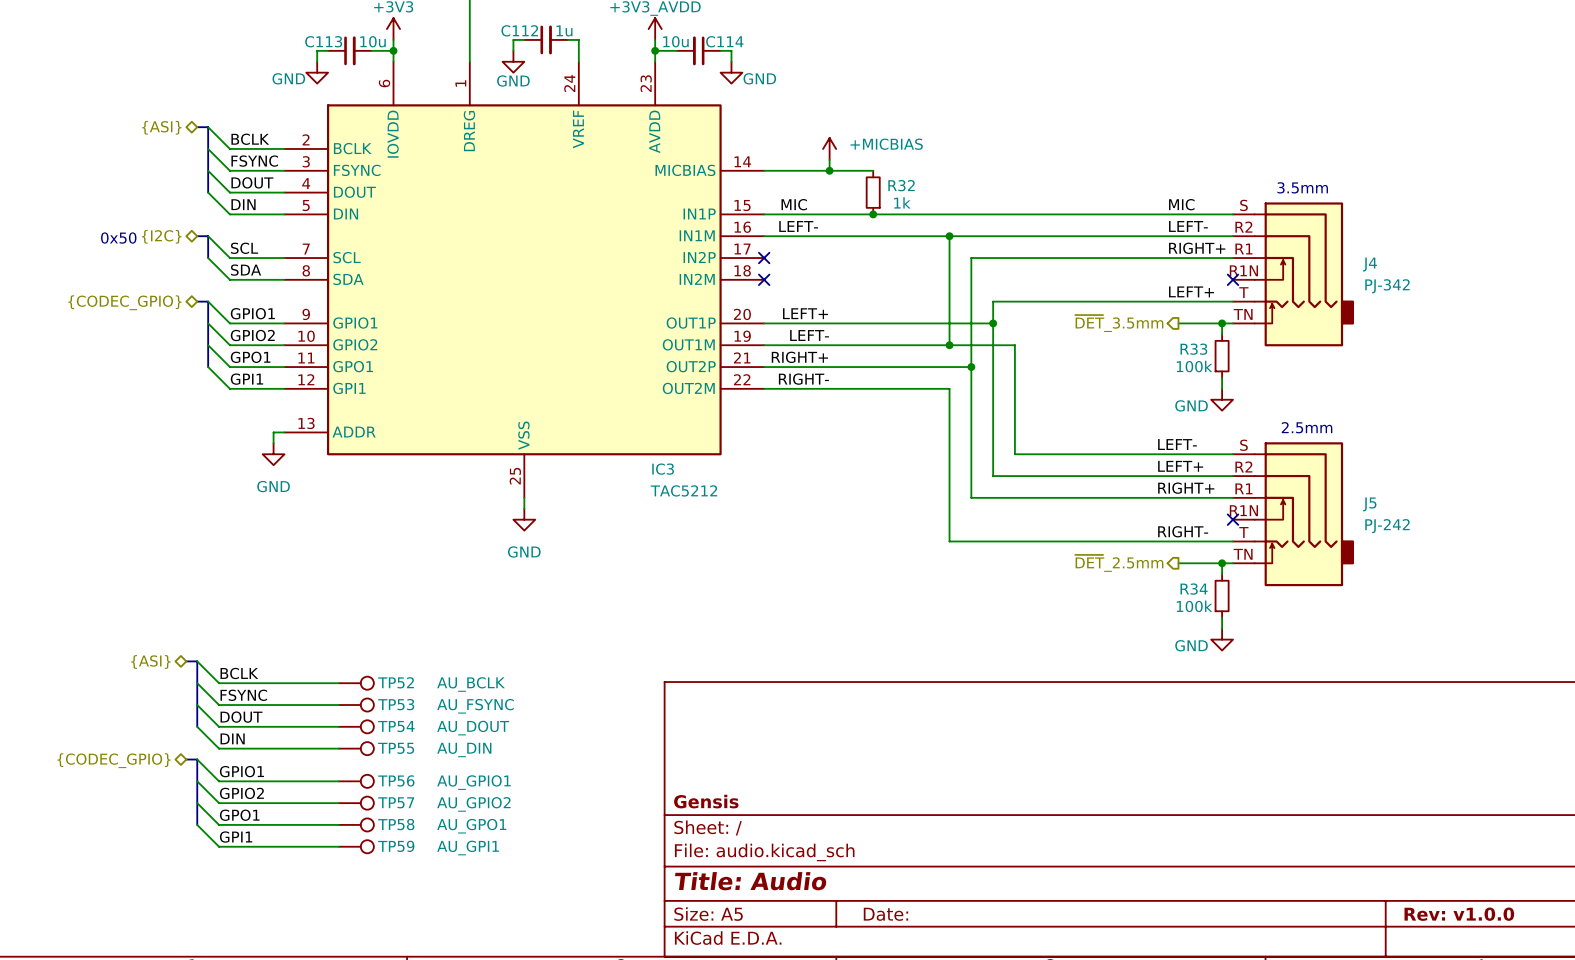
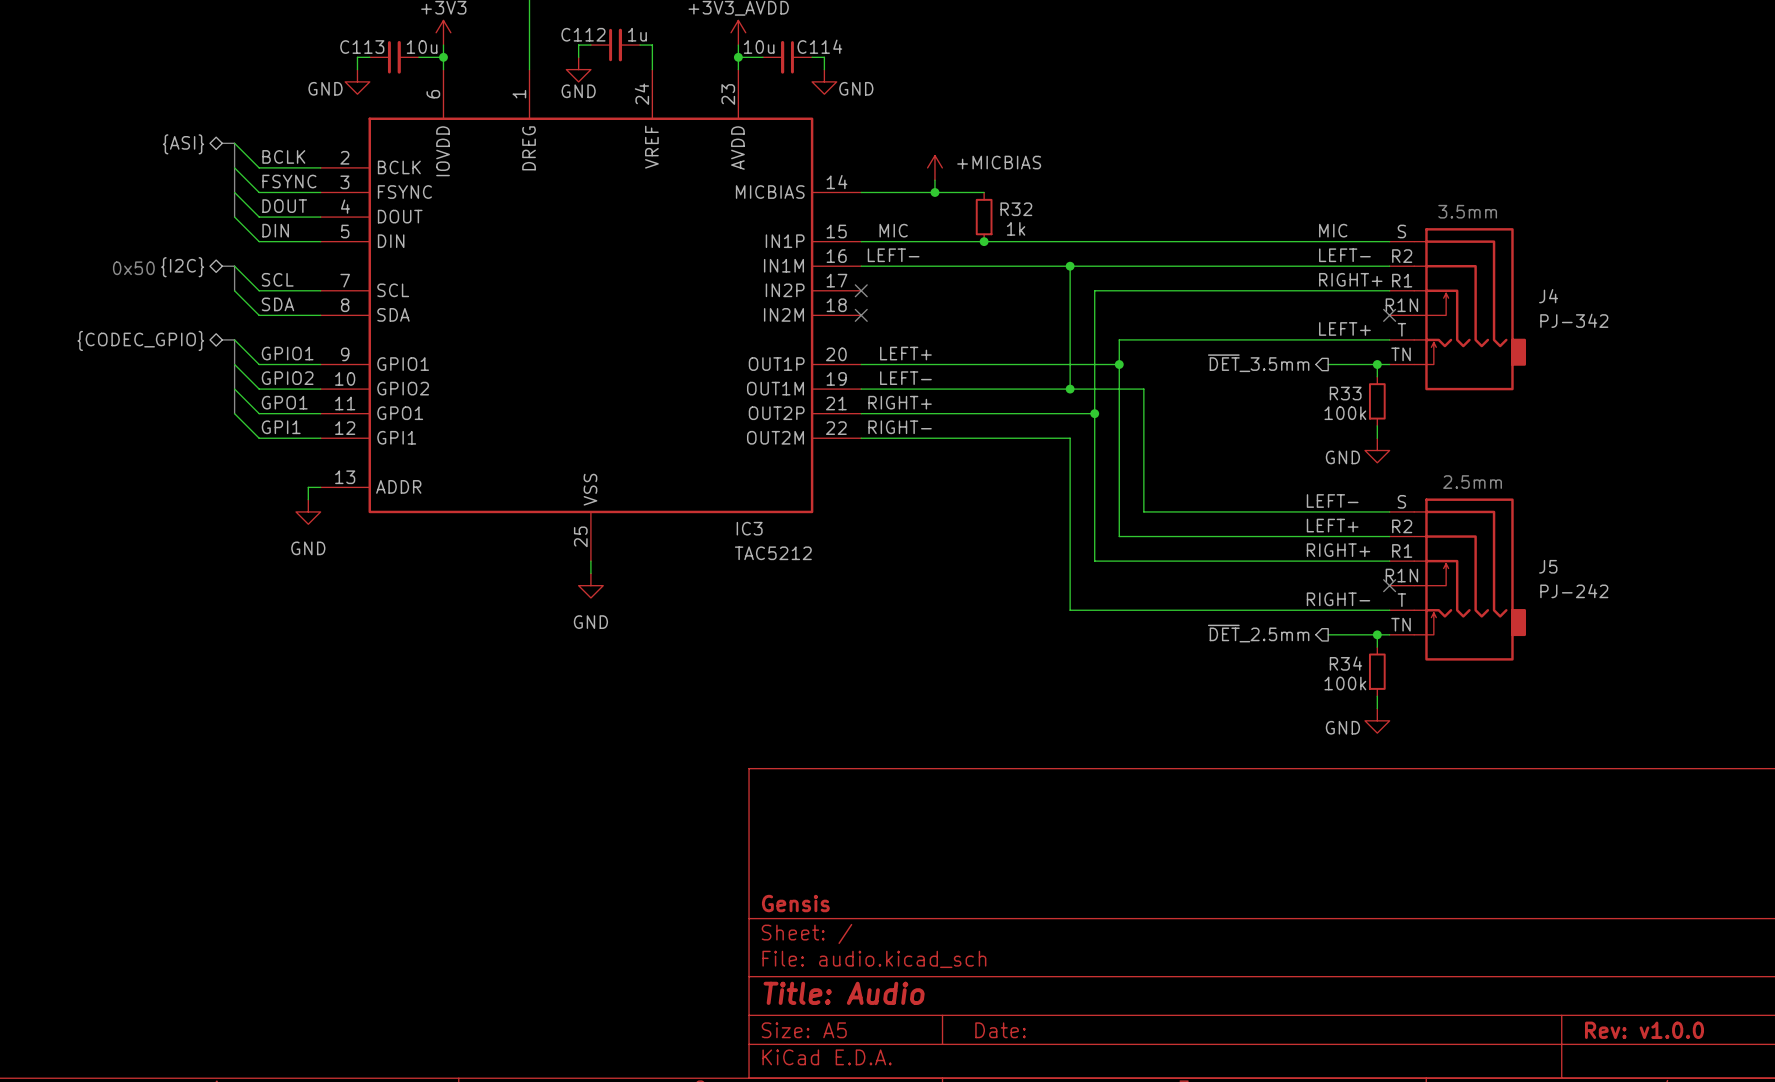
hierarchical label: {ASI} (150, 661) -> none
bus: (186, 661) (197, 661) (197, 726) -> none
wire: (197, 661) (219, 683) (338, 683) -> none
label: BCLK (239, 673) -> none
wire: (197, 683) (219, 705) (338, 705) -> none
TP52: AU_BCLK (356, 683) -> none
label: FSYNC (243, 695) -> none
wire: (197, 705) (219, 726) (338, 726) -> none
TP53: AU_FSYNC (356, 705) -> none
label: DOUT (241, 717) -> none
wire: (197, 726) (219, 748) (338, 748) -> none
TP54: AU_DOUT (356, 726) -> none
label: DIN (232, 738) -> none
TP55: AU_DIN (356, 748) -> none
bus: (186, 759) (197, 759) (197, 824) -> none
wire: (197, 759) (219, 781) (338, 781) -> none
hierarchical label: {CODEC_GPIO} (114, 760) -> none
label: GPIO1 (241, 771) -> none
wire: (197, 781) (219, 803) (338, 803) -> none
TP56: AU_GPIO1 (356, 781) -> none
label: GPIO2 (241, 793) -> none
wire: (197, 803) (219, 824) (338, 824) -> none
TP57: AU_GPIO2 (356, 803) -> none
label: GPO1 (239, 815) -> none
wire: (197, 824) (219, 846) (338, 846) -> none
TP58: AU_GPO1 (356, 824) -> none
label: GPI1 (236, 837) -> none
TP59: AU_GPI1 (356, 846) -> none

